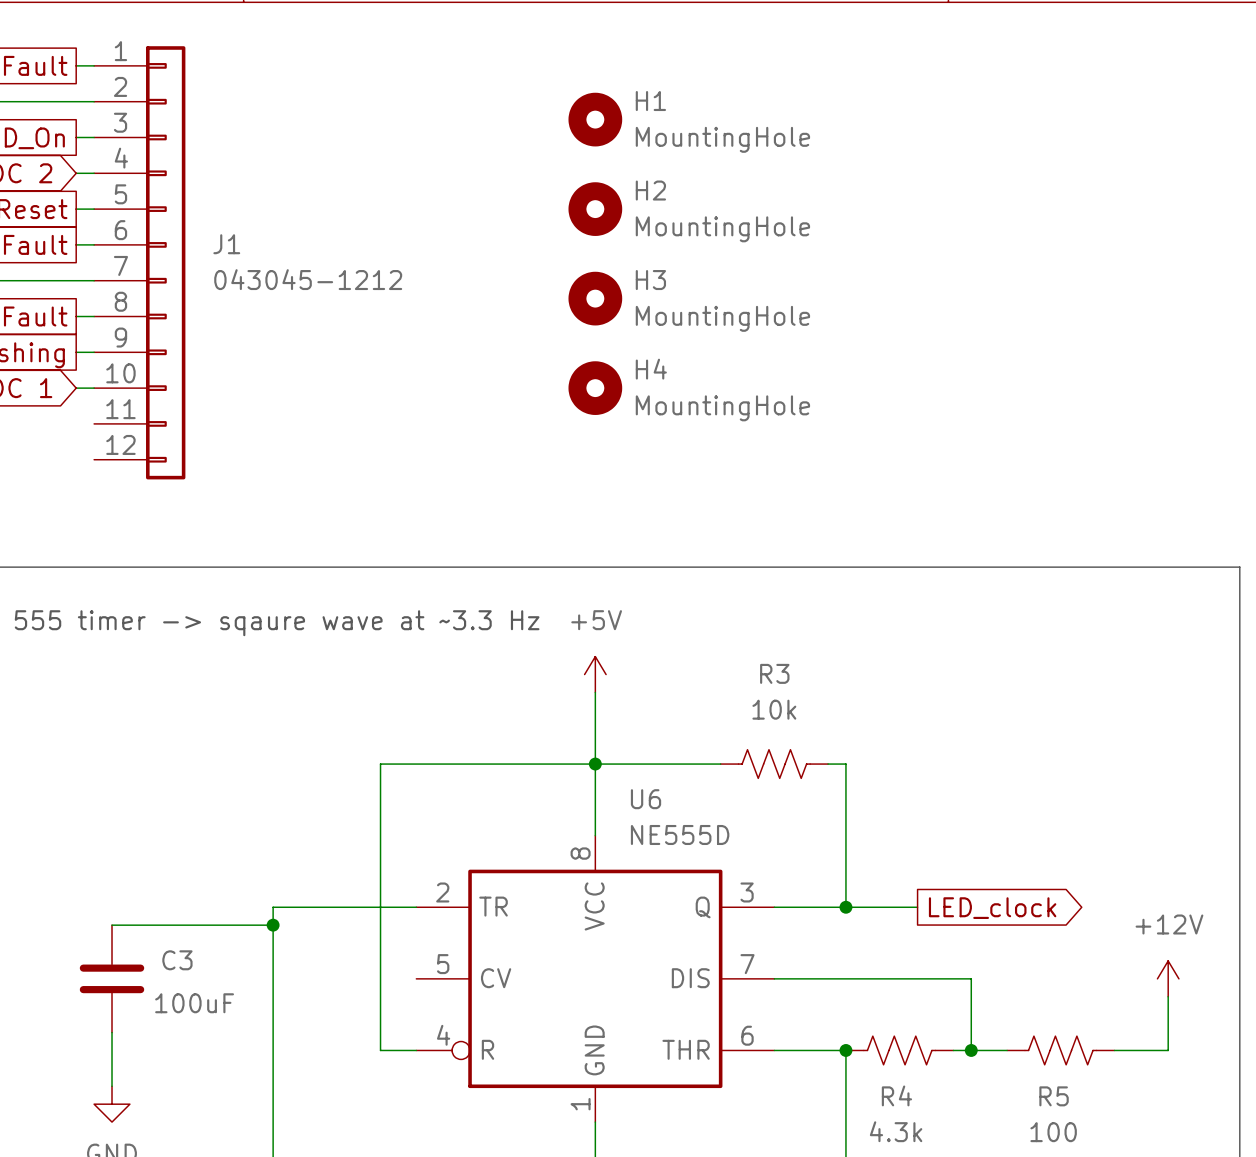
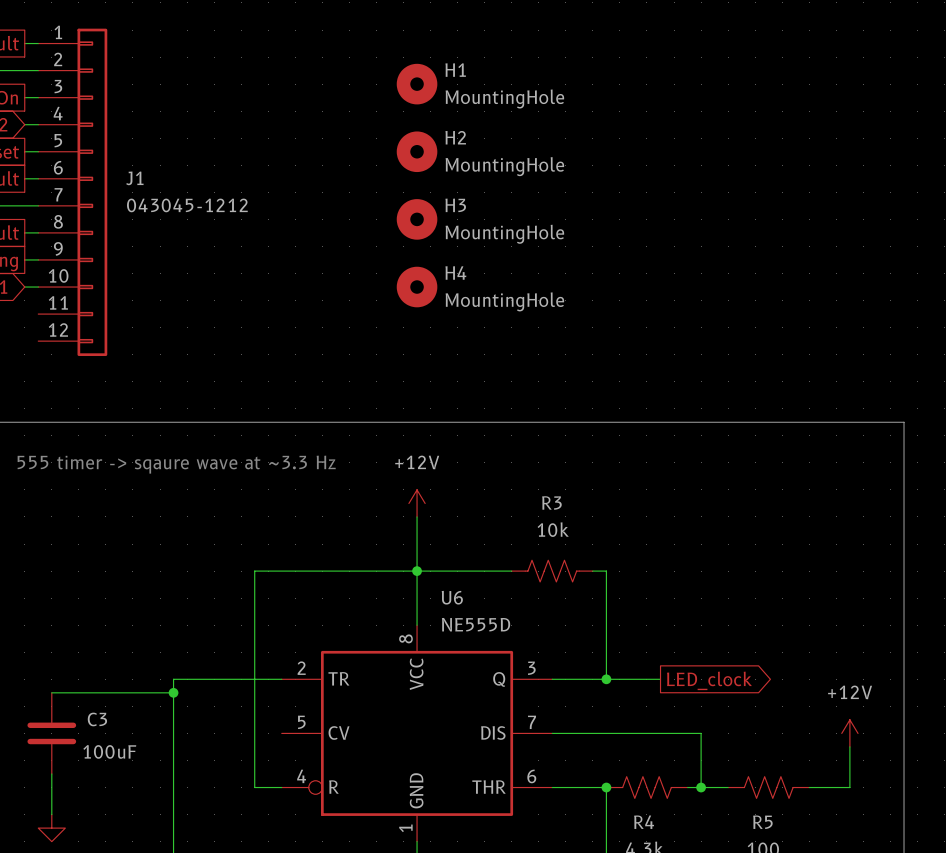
power symbol: +5V (595, 674) -> +12V (417, 503)

